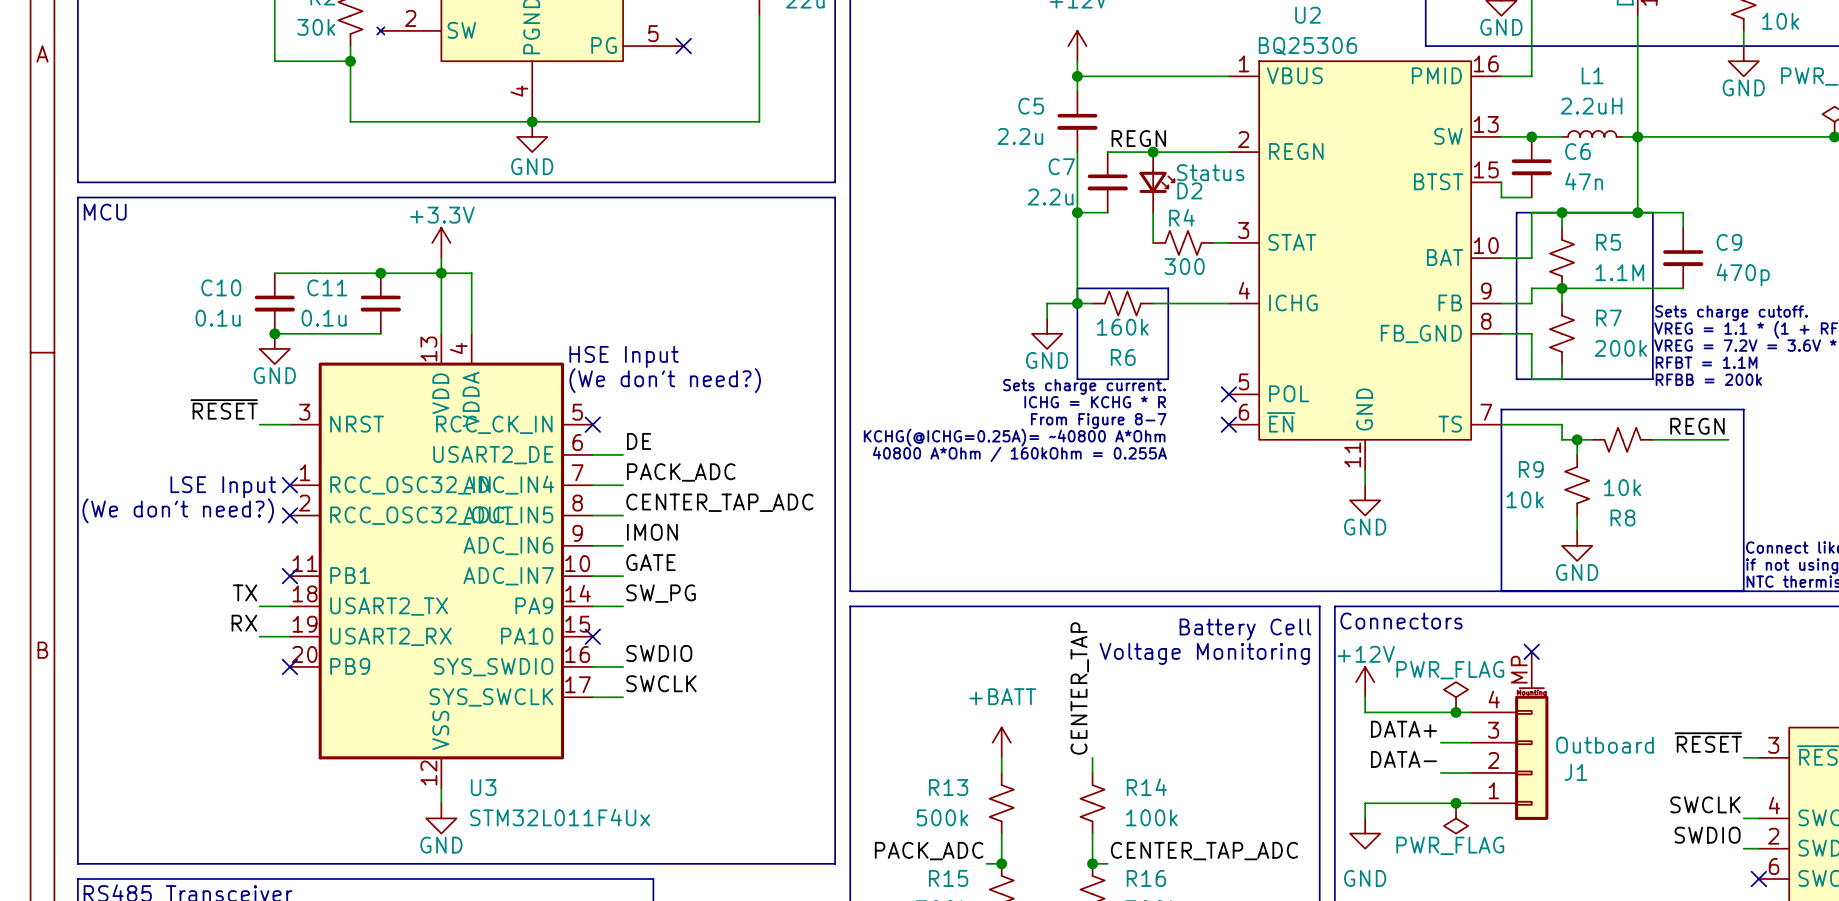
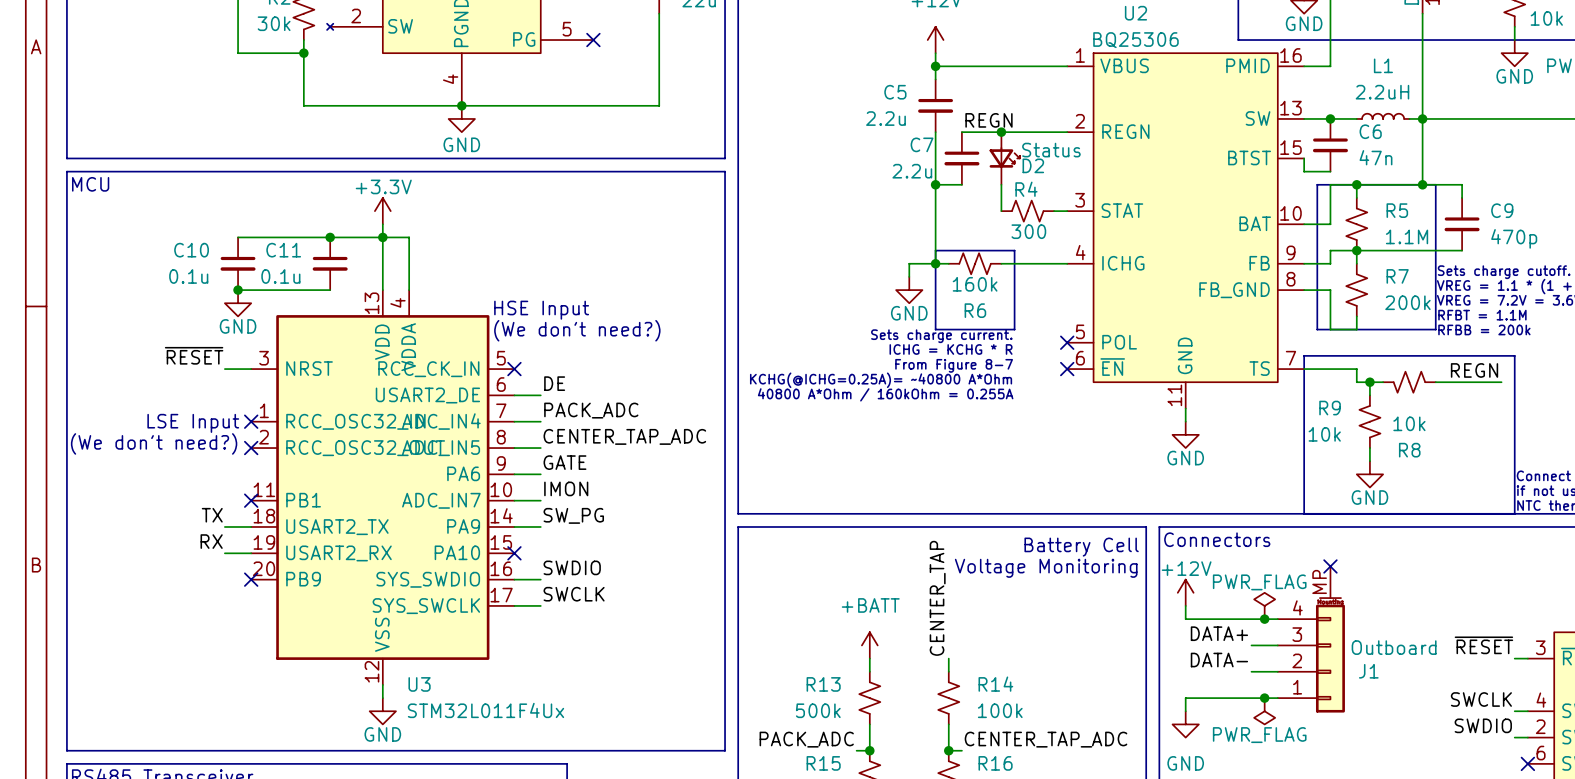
label: IMON (652, 532) -> GATE (564, 462)
U3 pin name: ADC_IN6 (508, 545) -> PA6 (463, 473)
label: GATE (650, 562) -> IMON (566, 488)

